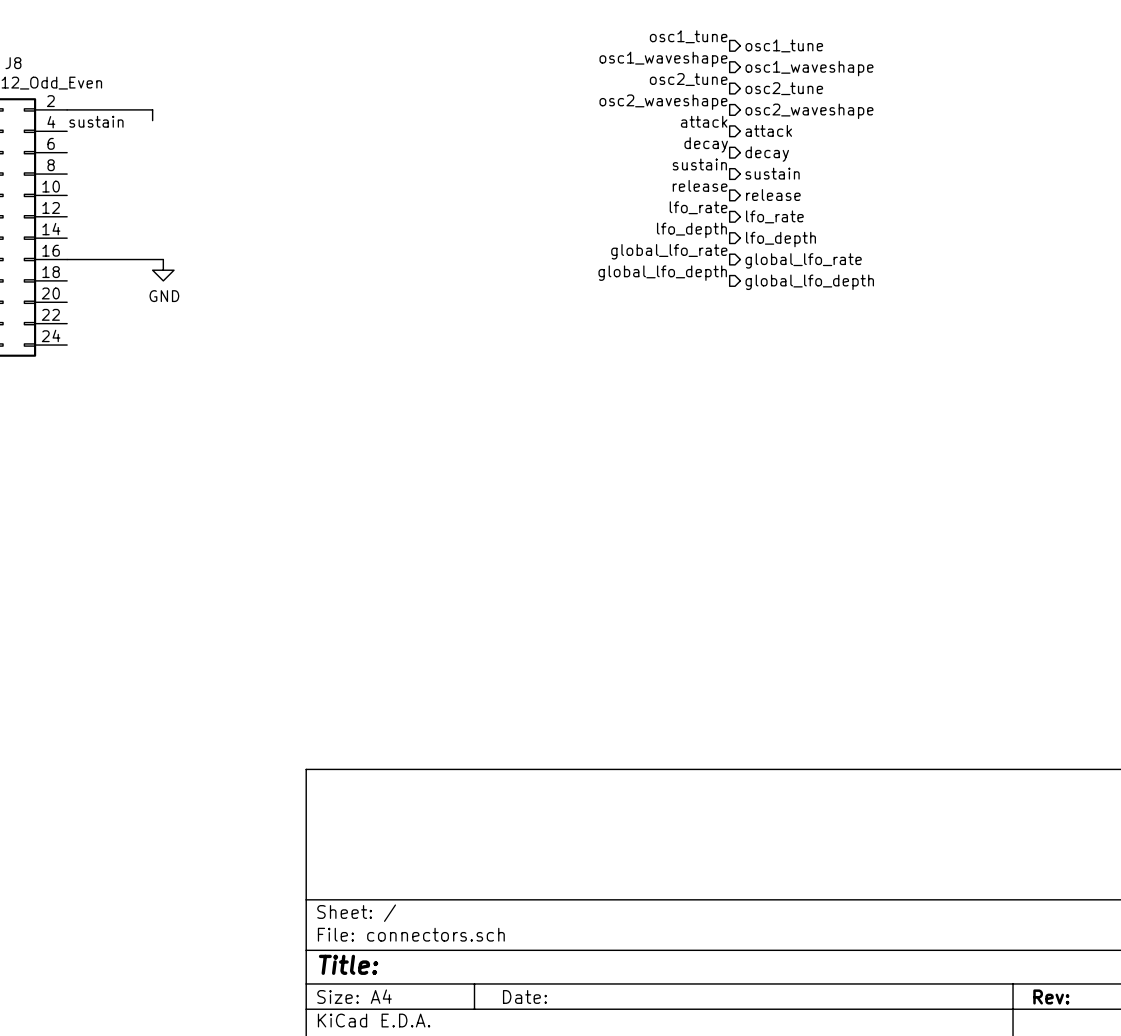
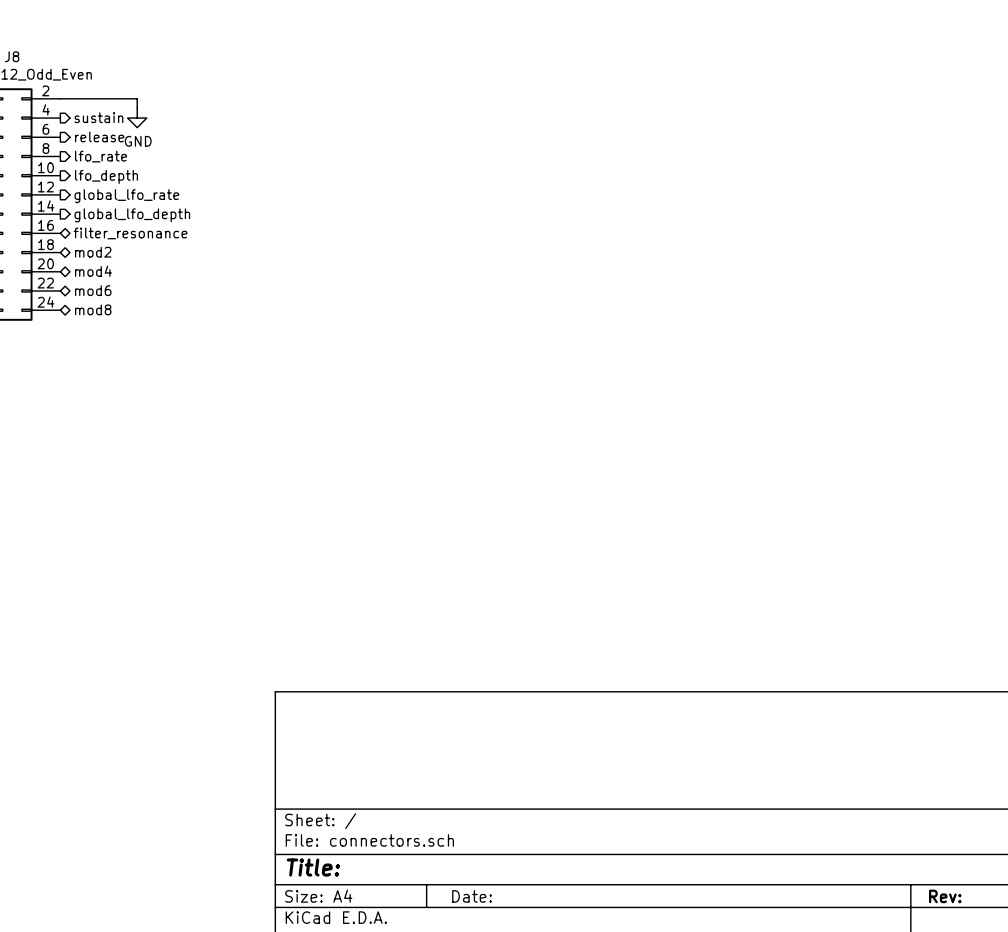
label: osc1_tune (688, 36) -> none
hierarchical label: osc1_tune (784, 45) -> none
label: osc1_waveshape (663, 59) -> none
hierarchical label: osc1_waveshape (809, 68) -> none
label: osc2_tune (688, 79) -> none
hierarchical label: osc2_tune (784, 88) -> none
label: osc2_waveshape (663, 102) -> none
hierarchical label: osc2_waveshape (809, 111) -> none
label: sustain (96, 121) -> none
label: attack (704, 121) -> none
hierarchical label: none -> sustain (98, 117)
hierarchical label: attack (768, 130) -> none
label: decay (706, 144) -> none
hierarchical label: none -> release (99, 136)
hierarchical label: decay (767, 154) -> none
label: sustain (699, 164) -> none
hierarchical label: sustain (772, 173) -> none
hierarchical label: none -> lfo_rate (101, 156)
label: release (700, 185) -> none
hierarchical label: release (773, 195) -> none
hierarchical label: none -> lfo_depth (106, 176)
label: lfo_rate (698, 207) -> none
hierarchical label: lfo_rate (774, 216) -> none
hierarchical label: none -> global_lfo_rate (126, 196)
label: lfo_depth (691, 230) -> none
hierarchical label: none -> global_lfo_depth (132, 215)
hierarchical label: lfo_depth (780, 239) -> none
label: global_lfo_rate (669, 251) -> none
wire: (67, 259) (163, 259) -> none
hierarchical label: none -> filter_resonance (130, 233)
hierarchical label: global_lfo_rate (803, 260) -> none
power symbol position: GND (163, 270) -> GND (137, 118)
label: global_lfo_depth (662, 273) -> none
hierarchical label: none -> mod2 (93, 252)
hierarchical label: global_lfo_depth (809, 282) -> none
hierarchical label: none -> mod4 (93, 271)
hierarchical label: none -> mod6 (93, 290)
hierarchical label: none -> mod8 (93, 309)

